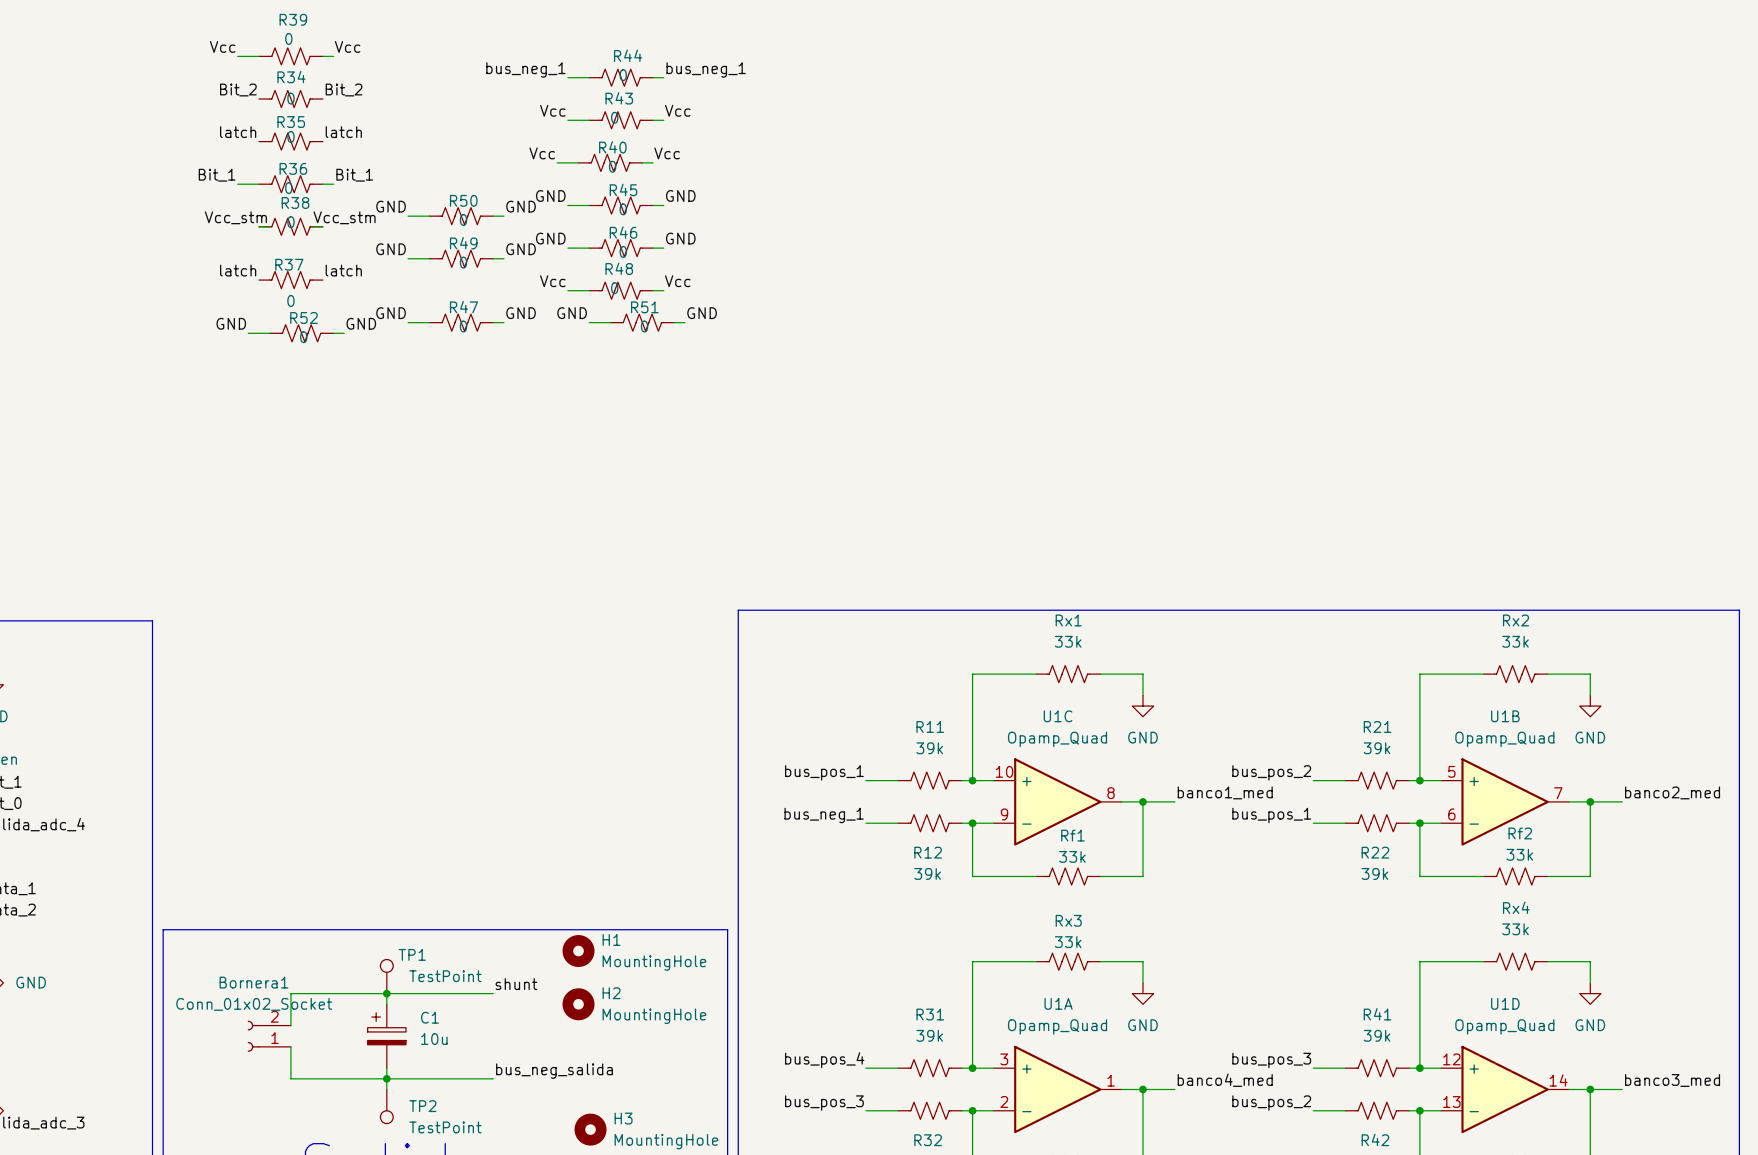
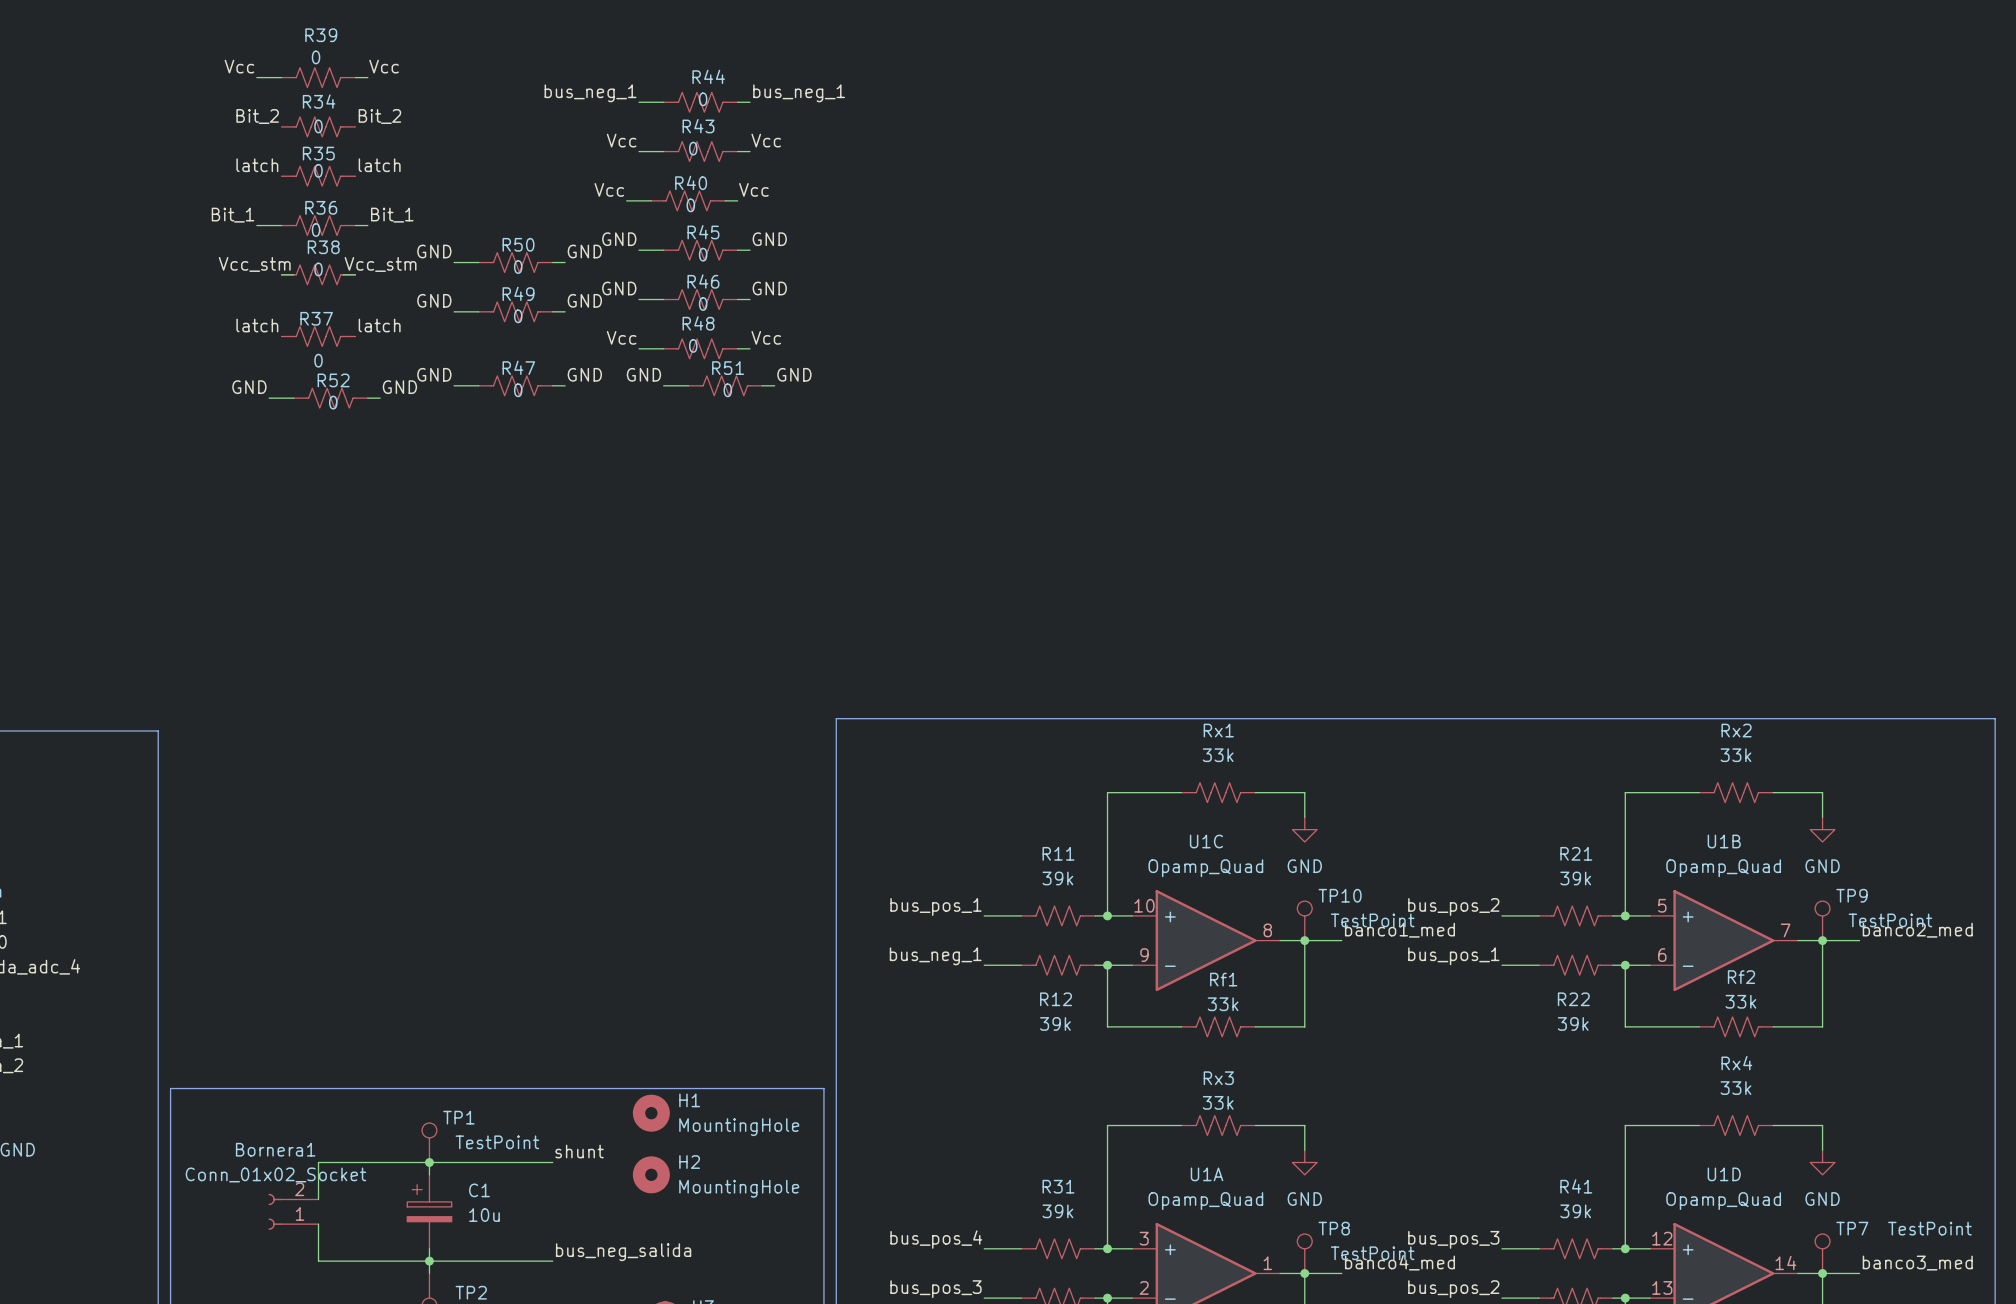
TP10: none -> TestPoint (1304, 920)
TP9: none -> TestPoint (1822, 920)
TP8: none -> TestPoint (1304, 1253)
TP7: none -> TestPoint (1822, 1253)

